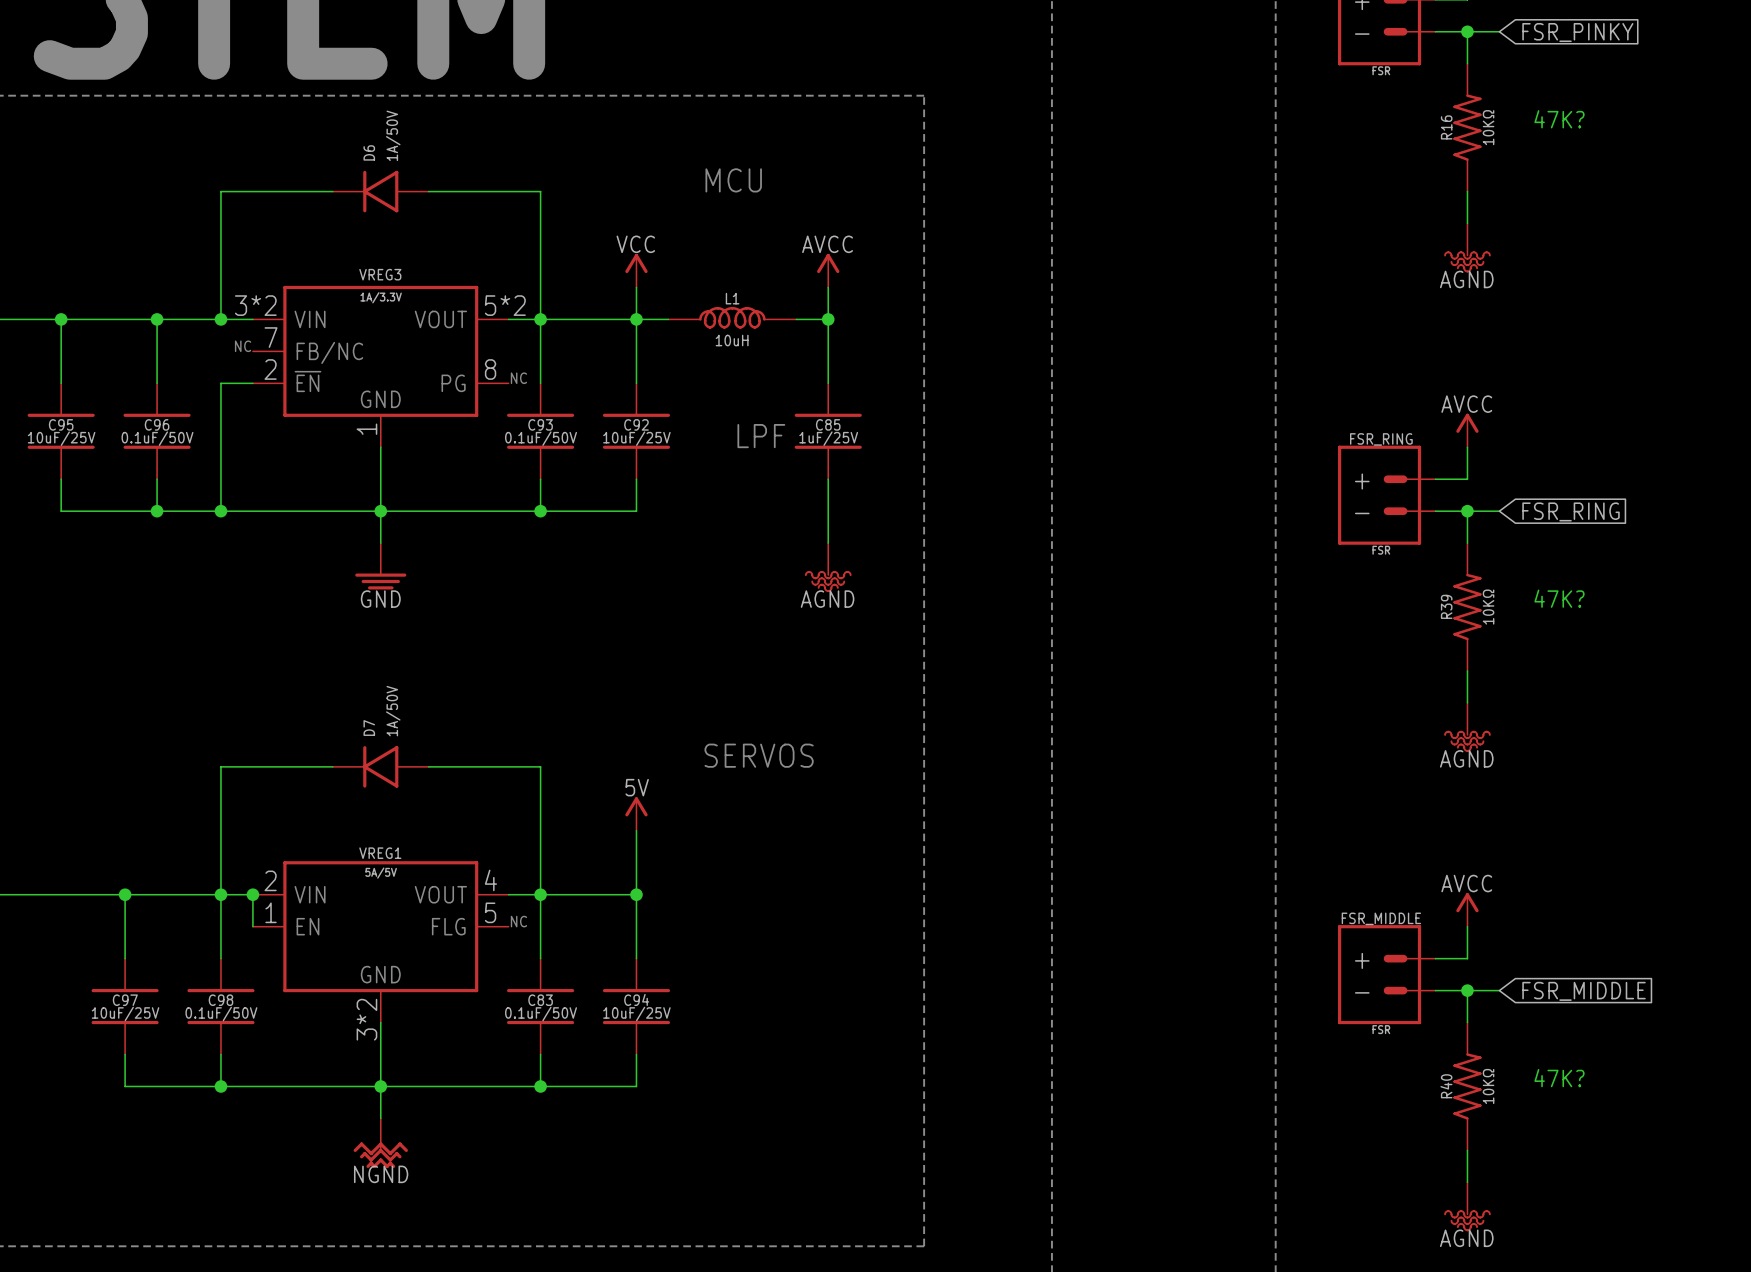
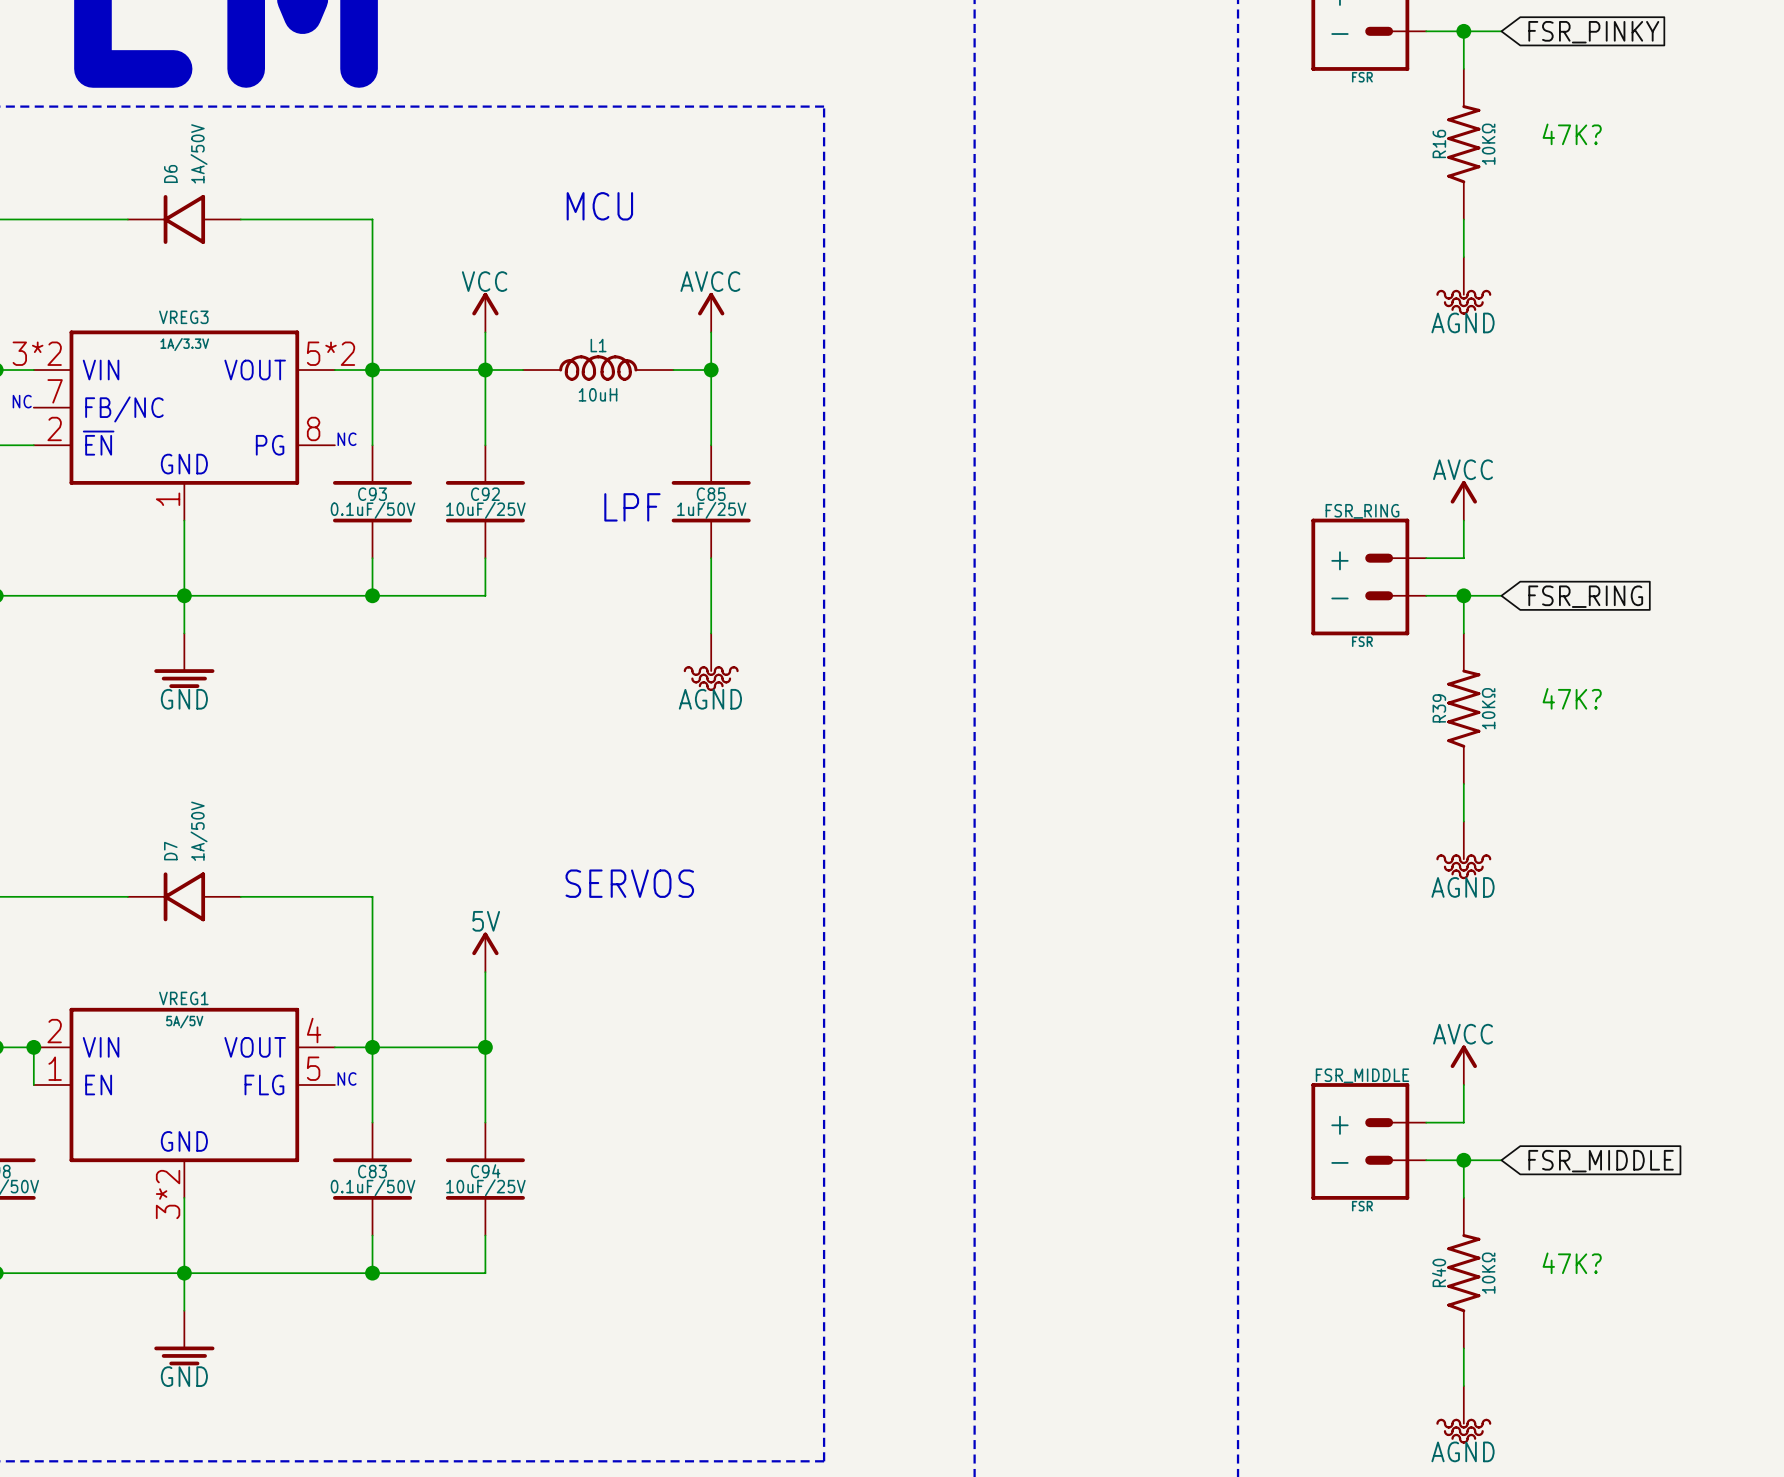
power symbol shape: [353, 1118, 408, 1168] -> [154, 1310, 215, 1366]

